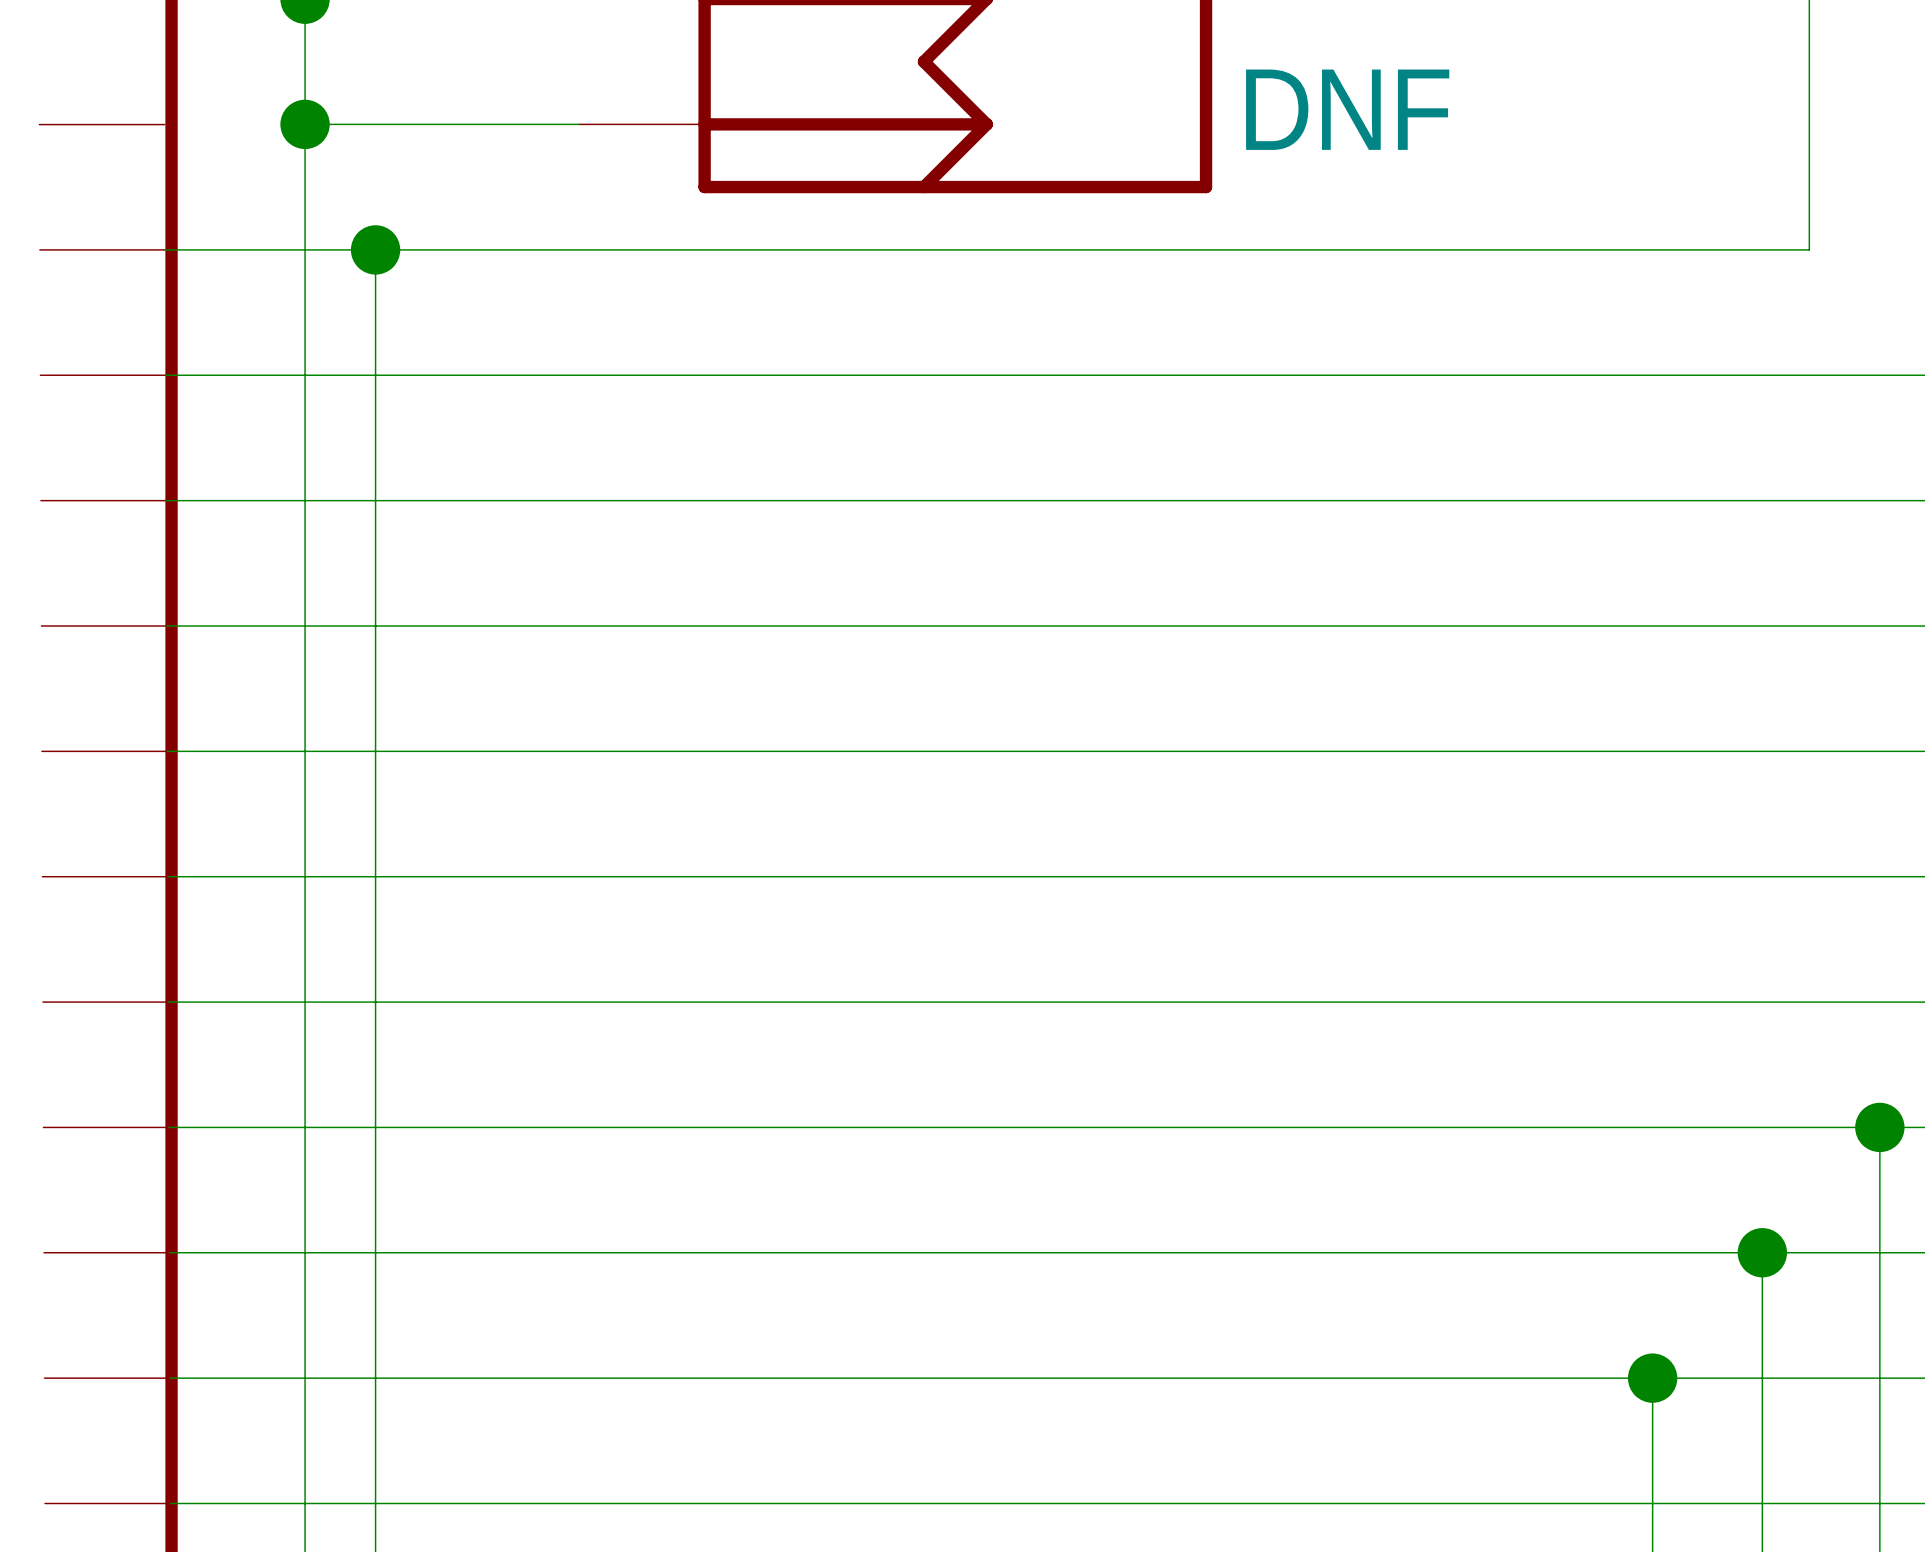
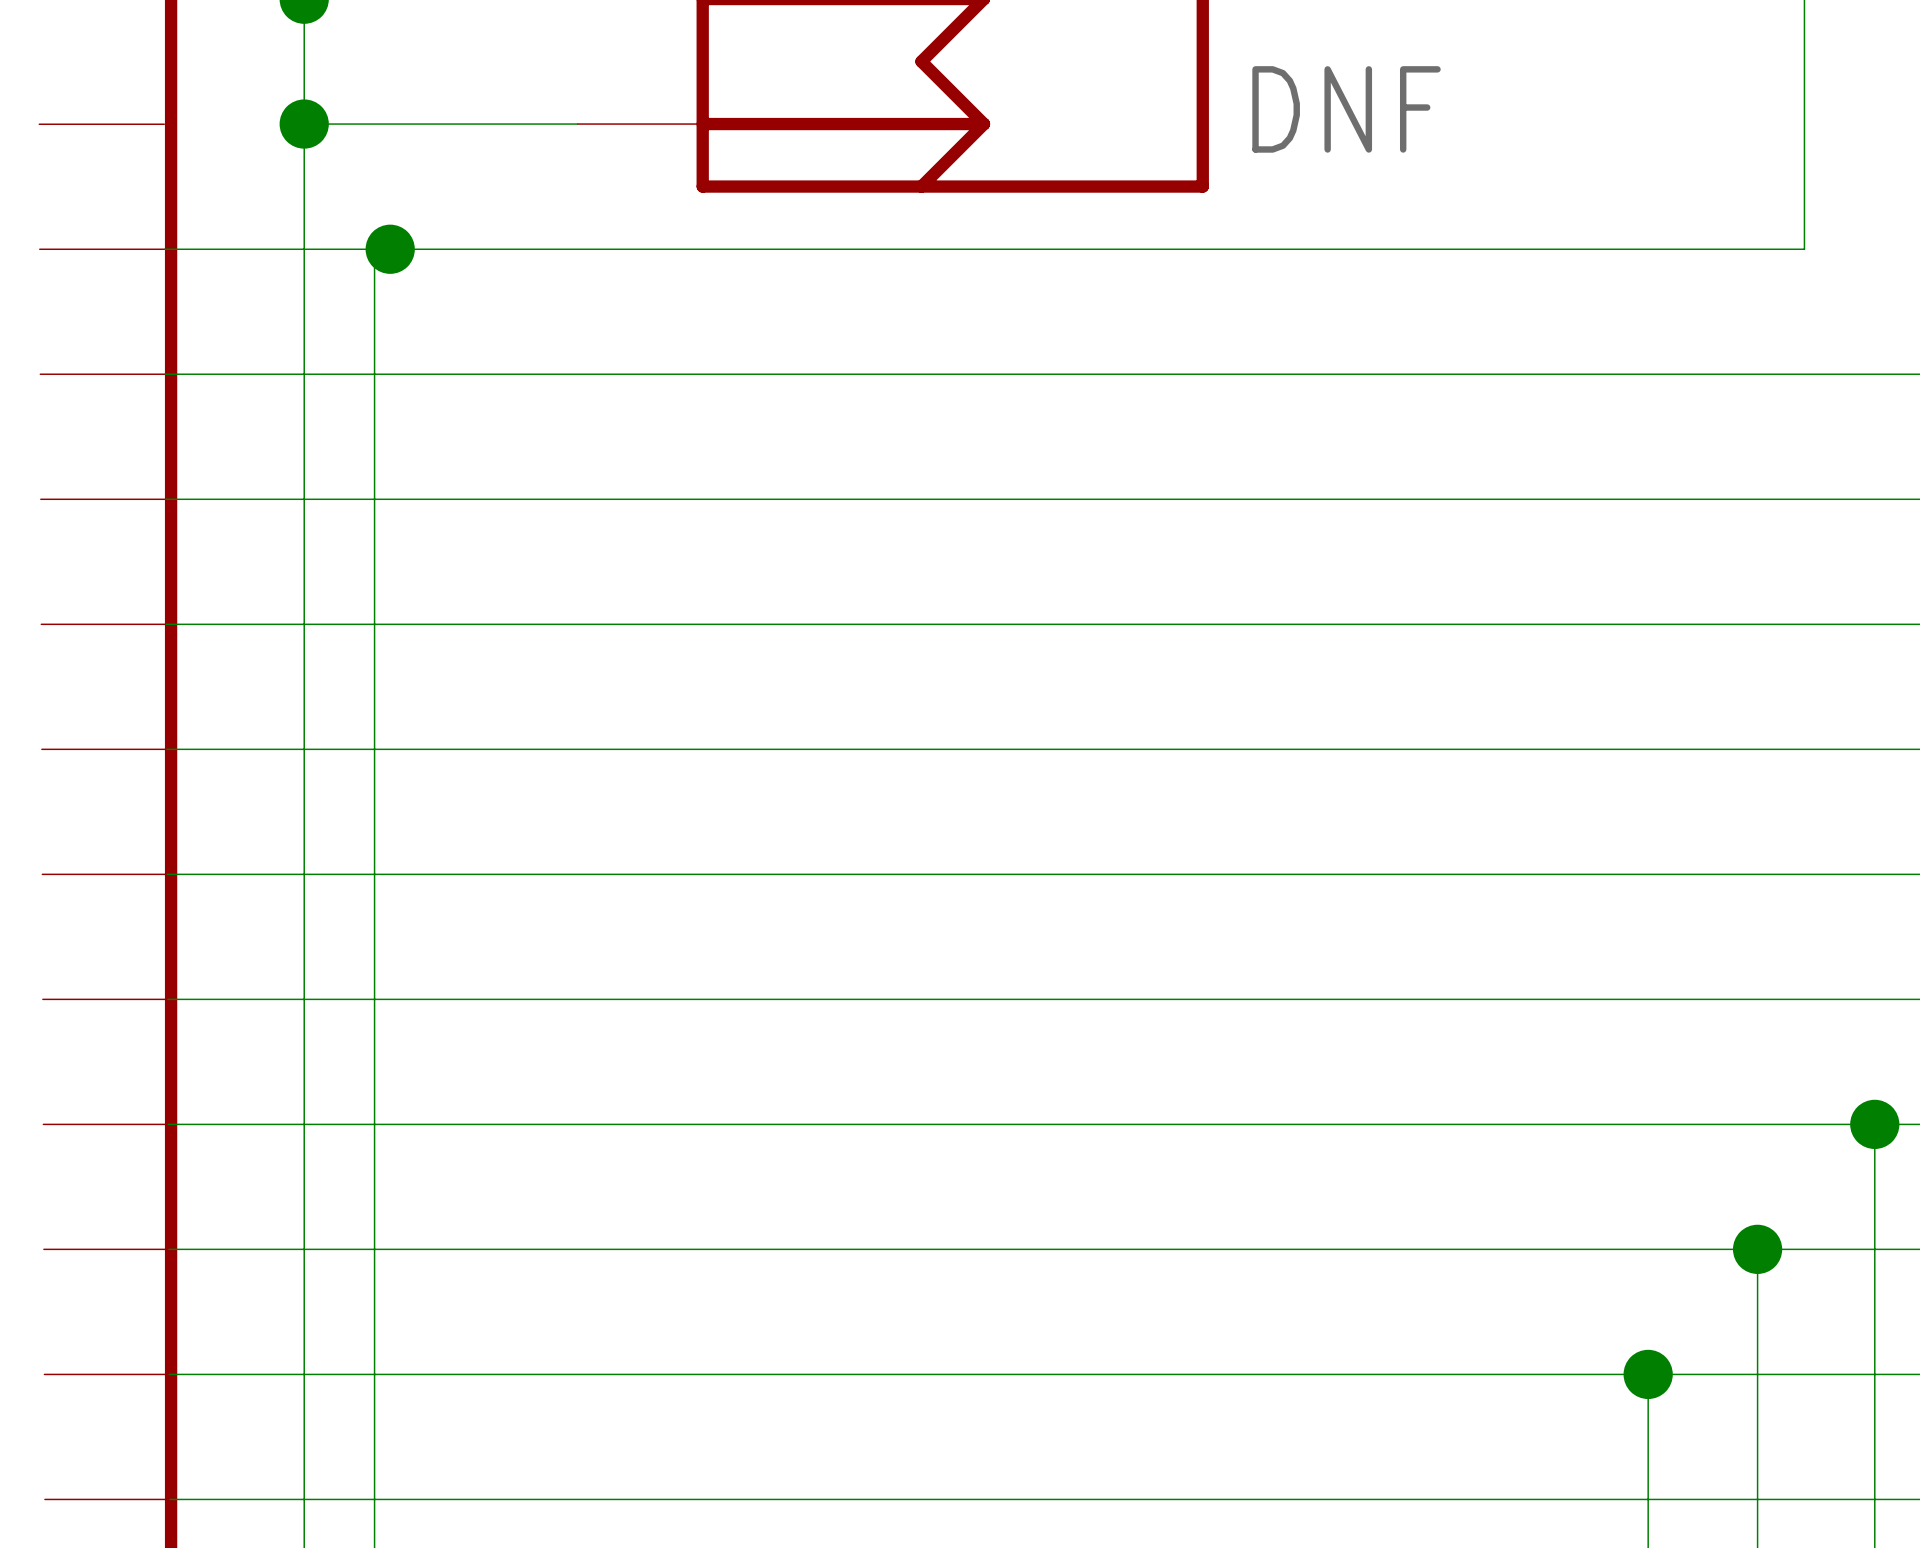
junction position: (375, 249) -> (390, 249)

